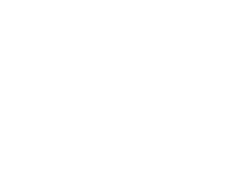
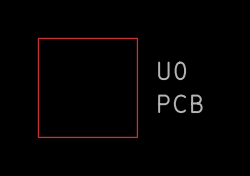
U0: none -> PCB (87, 87)

